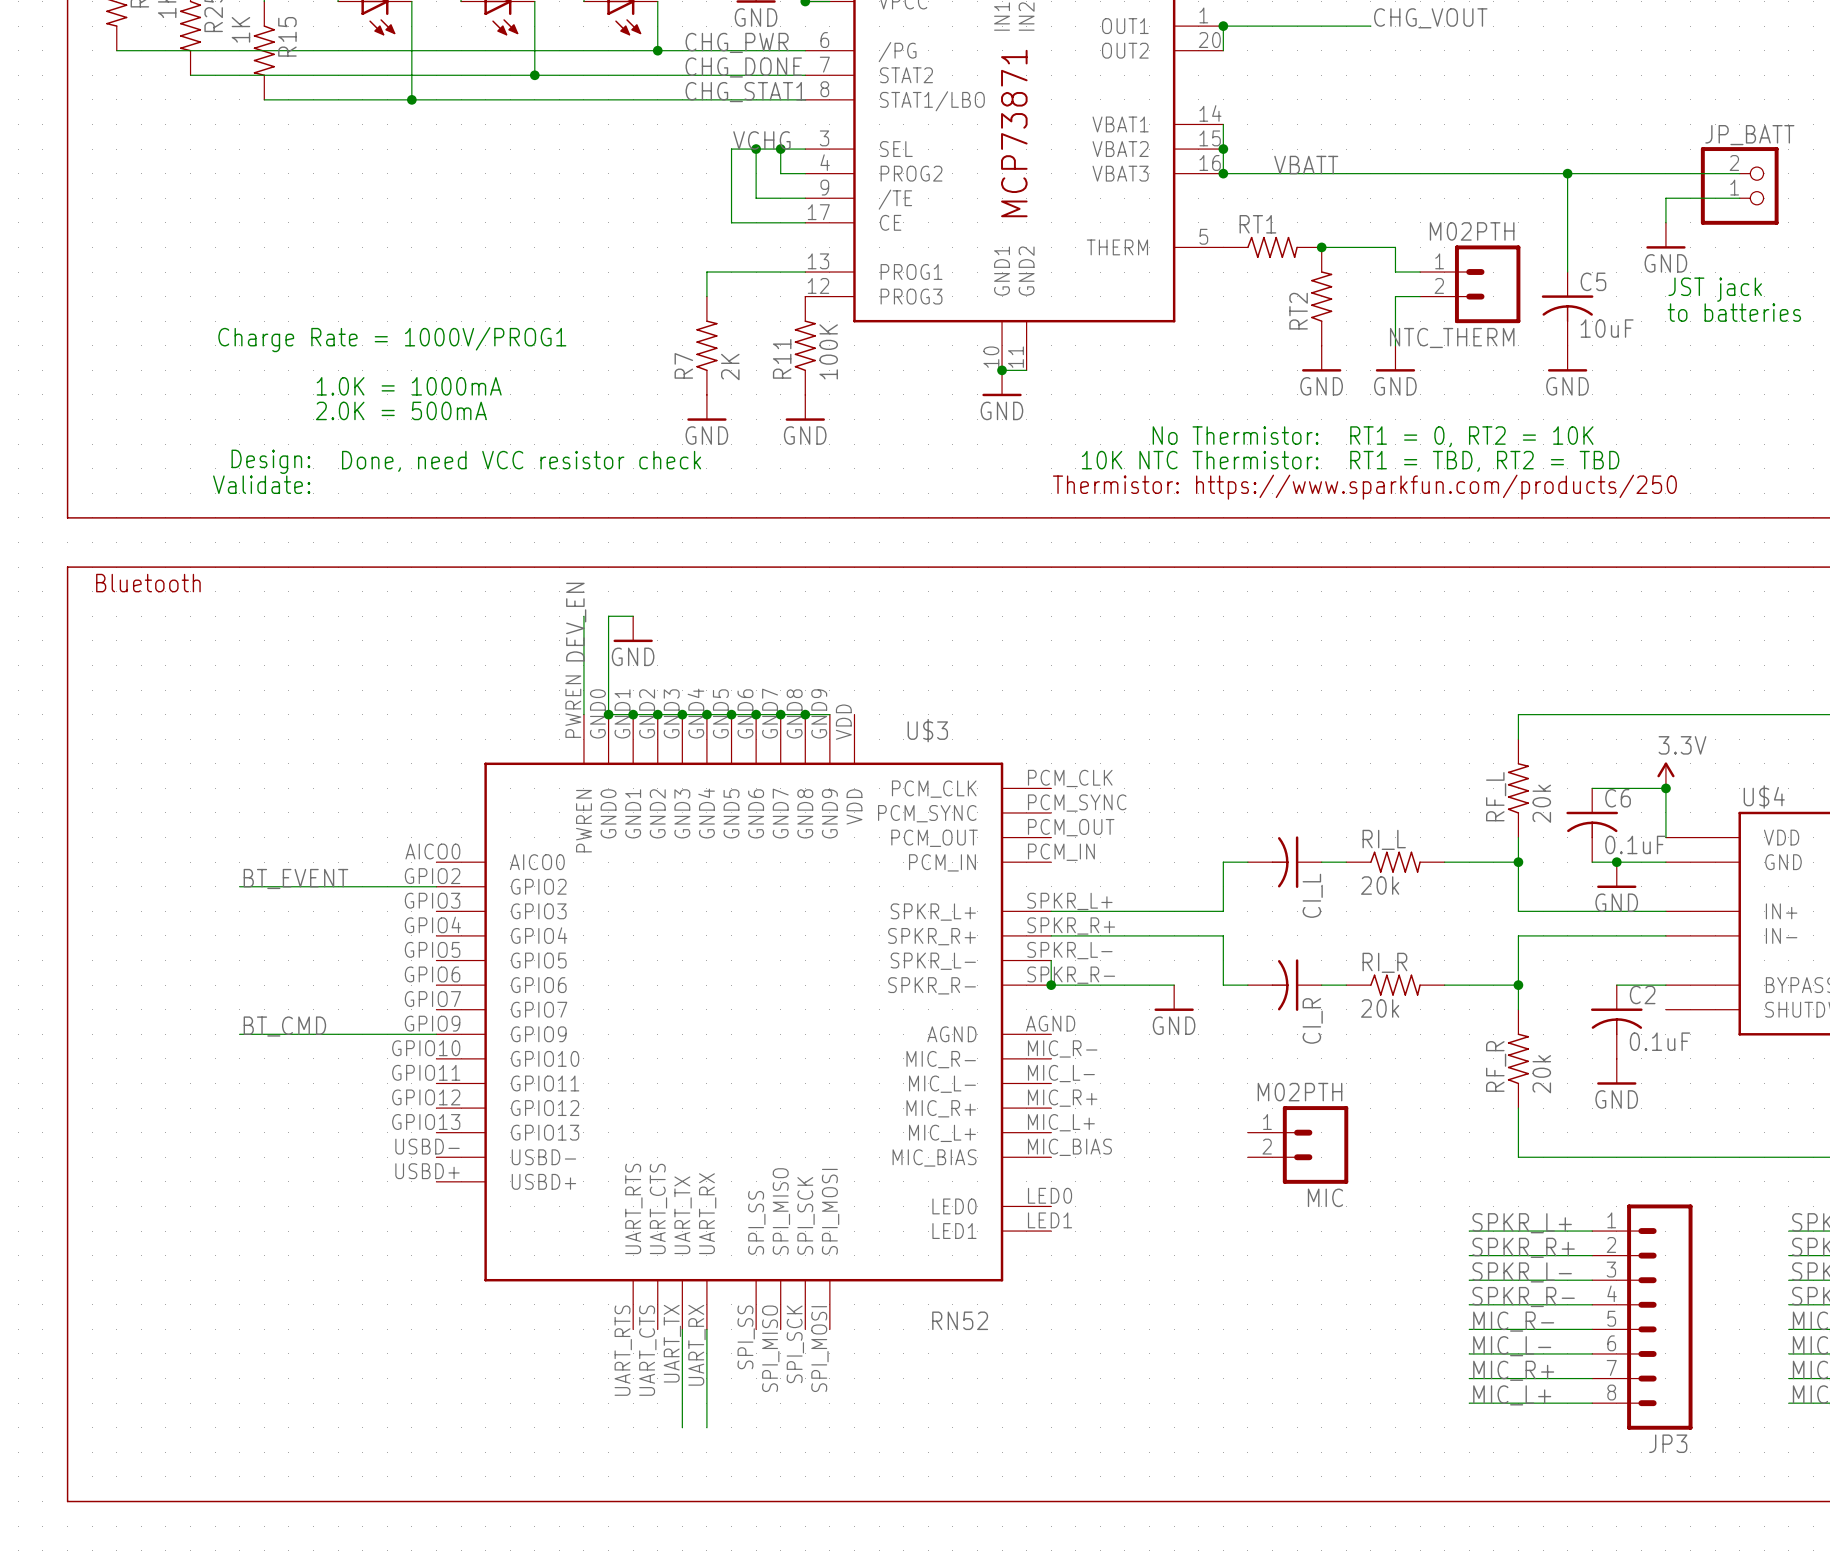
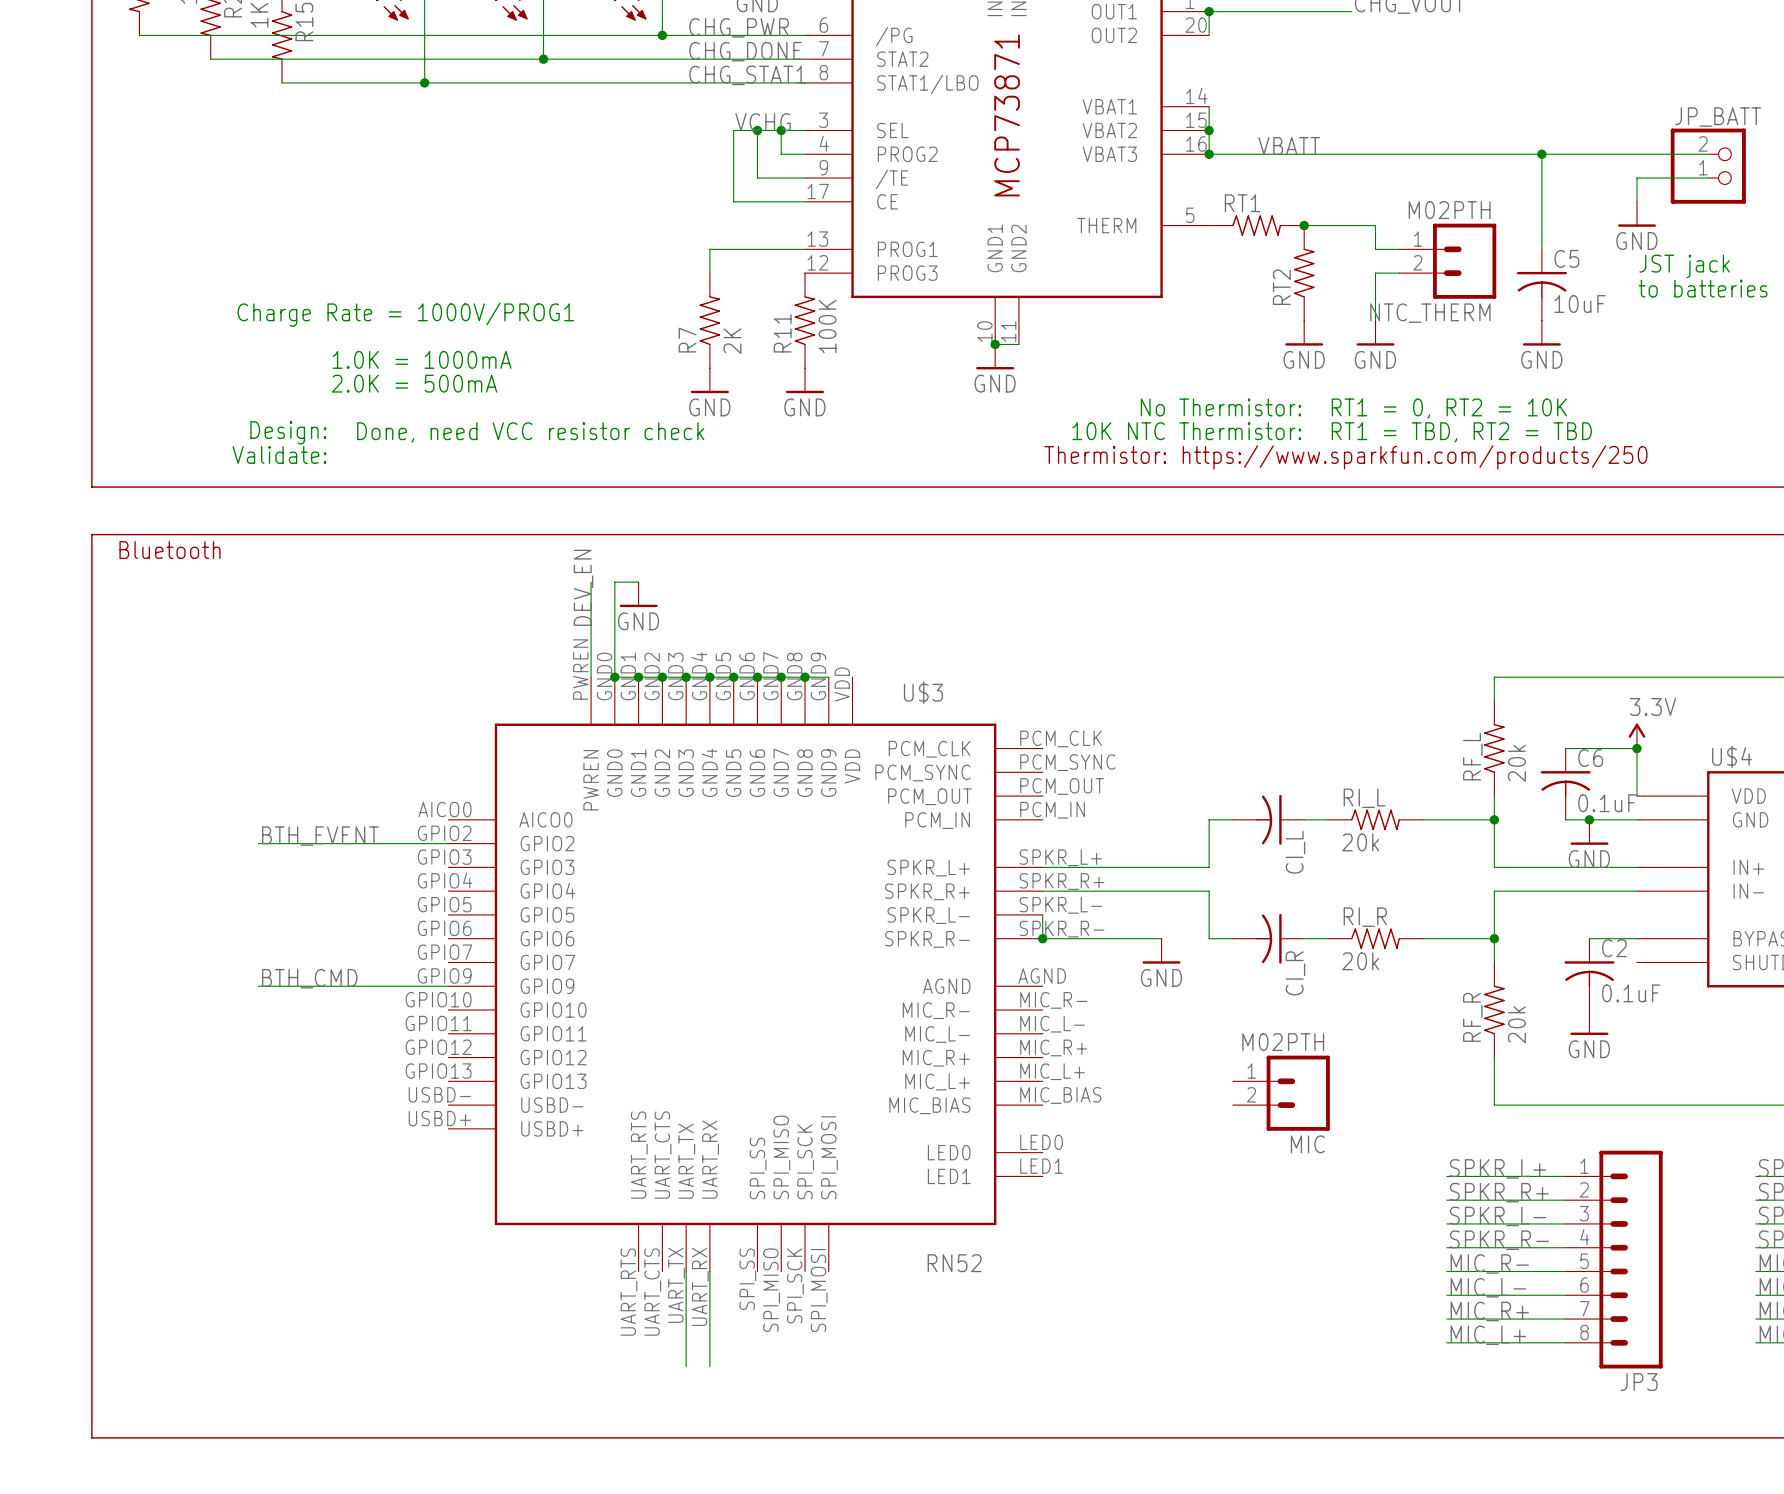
label: BT_EVENT (295, 878) -> BTH_EVENT (320, 836)
label: BT_CMD (284, 1026) -> BTH_CMD (309, 978)

